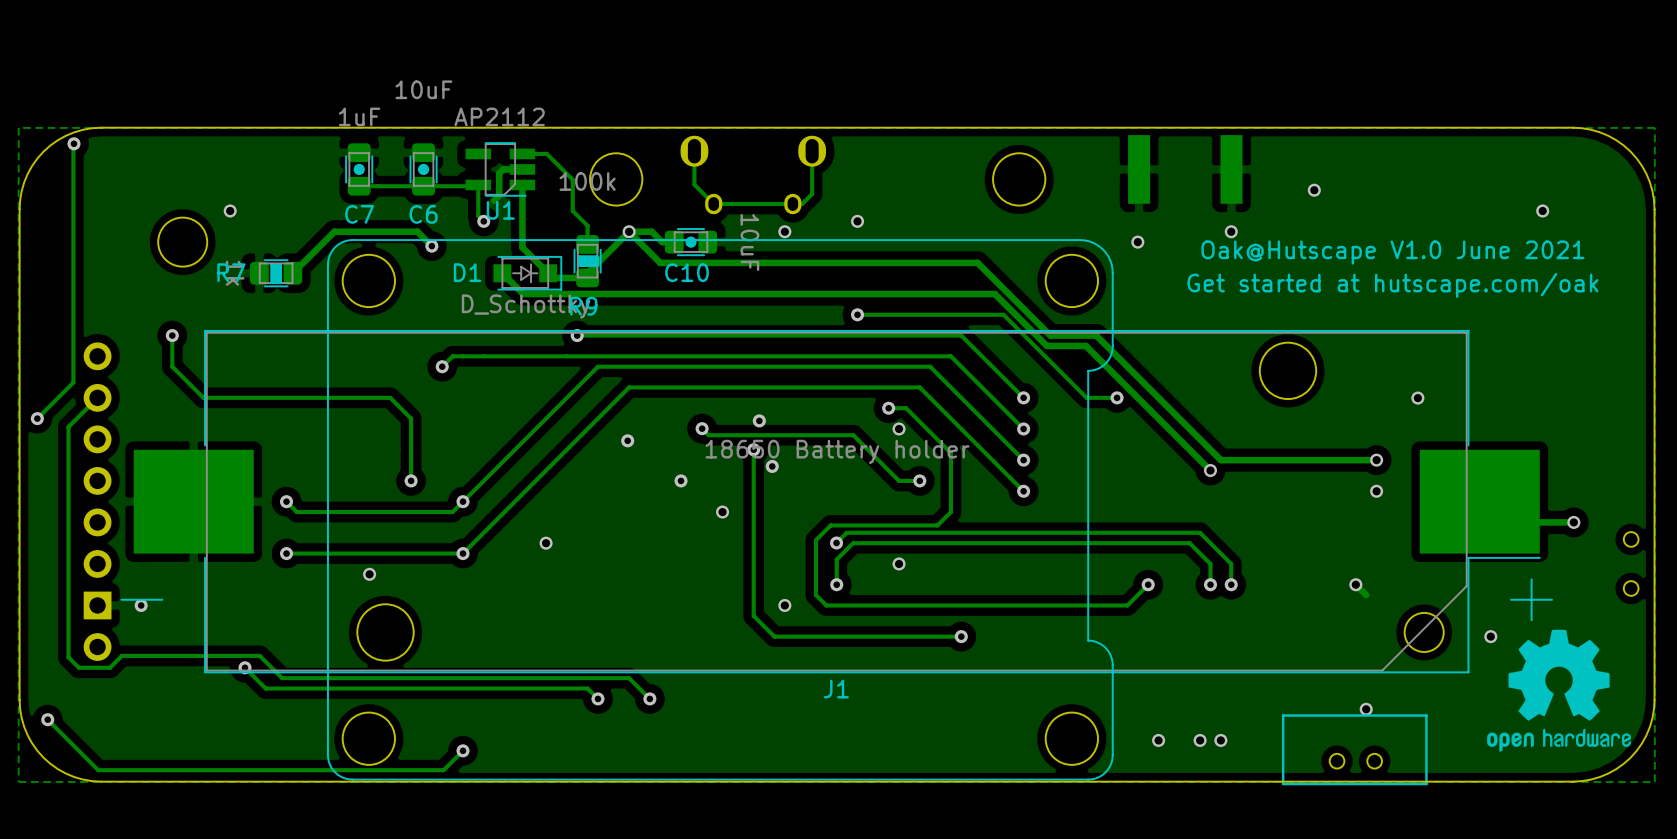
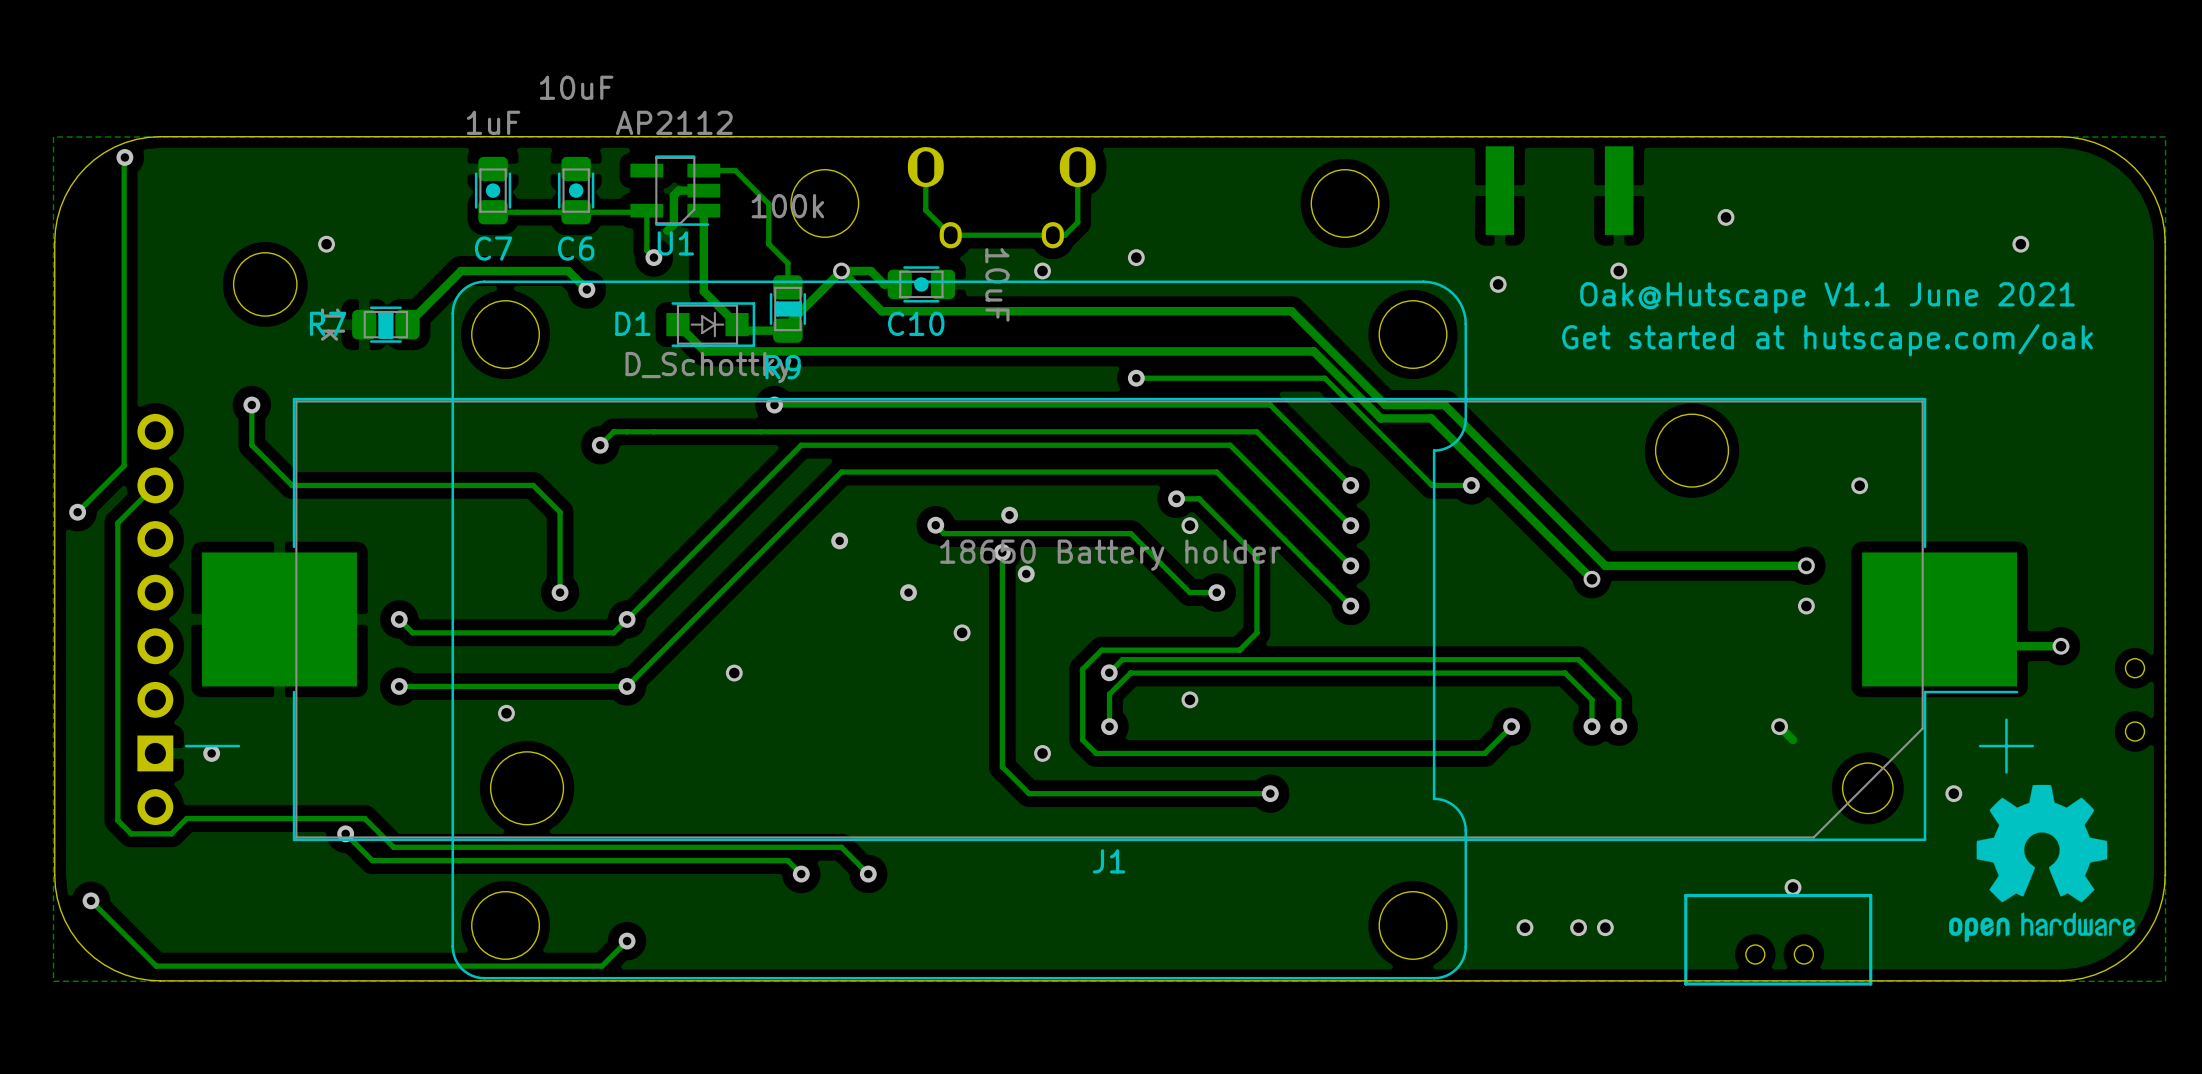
text: Oak@Hutscape V1.0 June 2021 (1392, 252) -> Oak@Hutscape V1.1 June 2021 (1827, 297)

